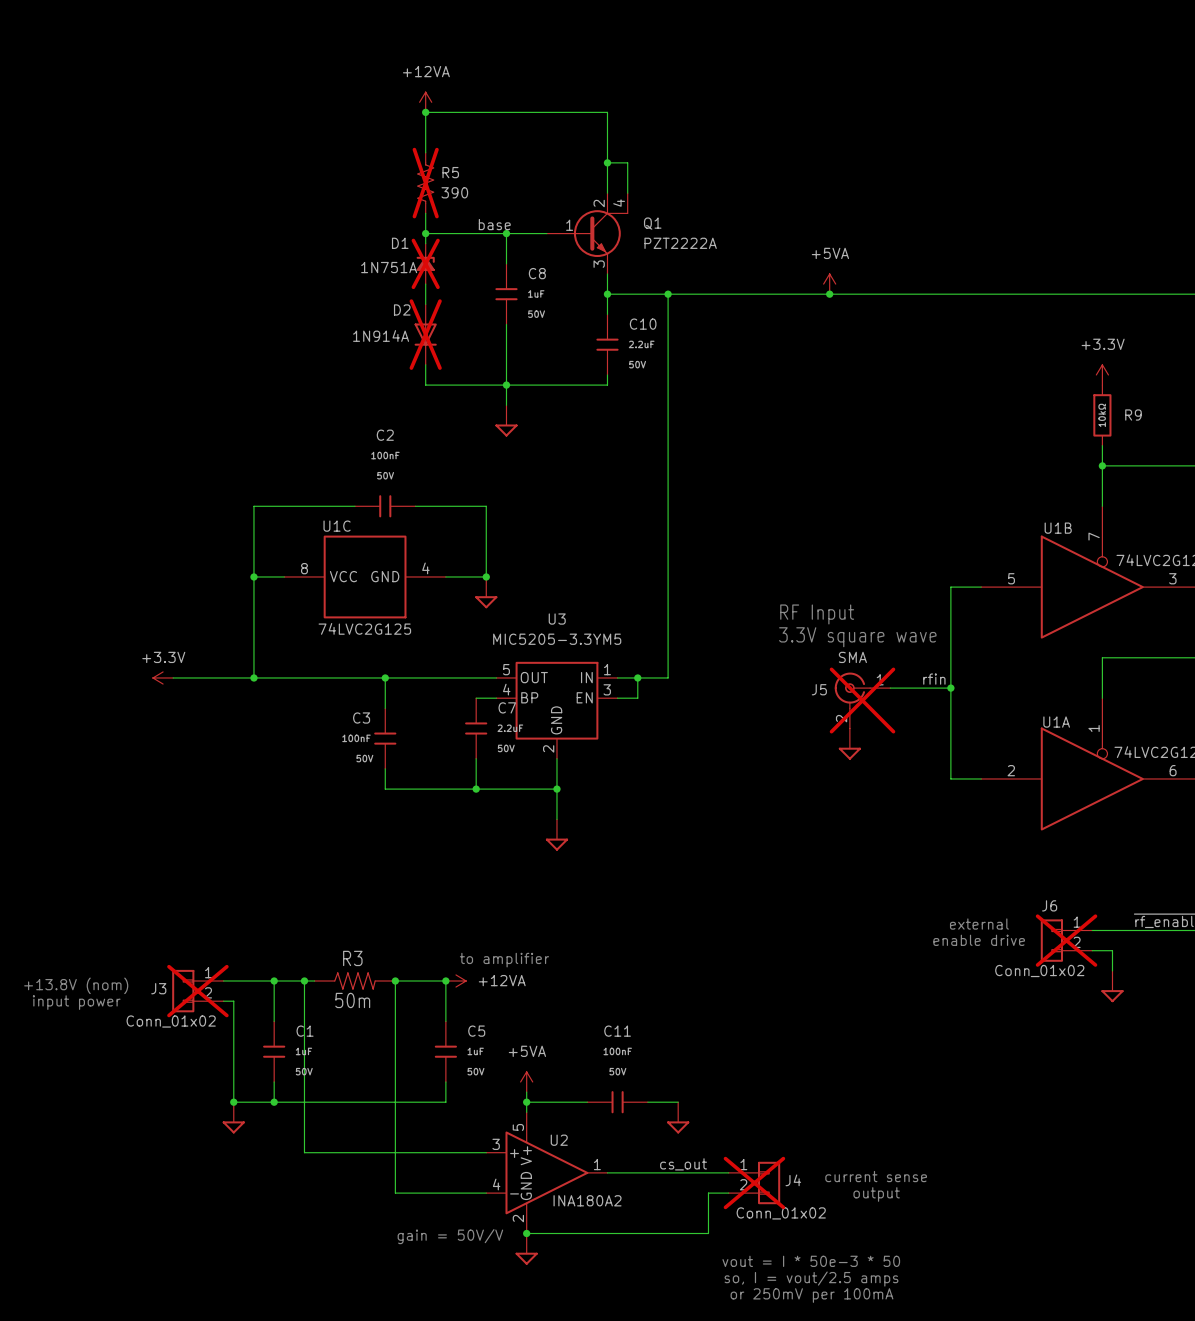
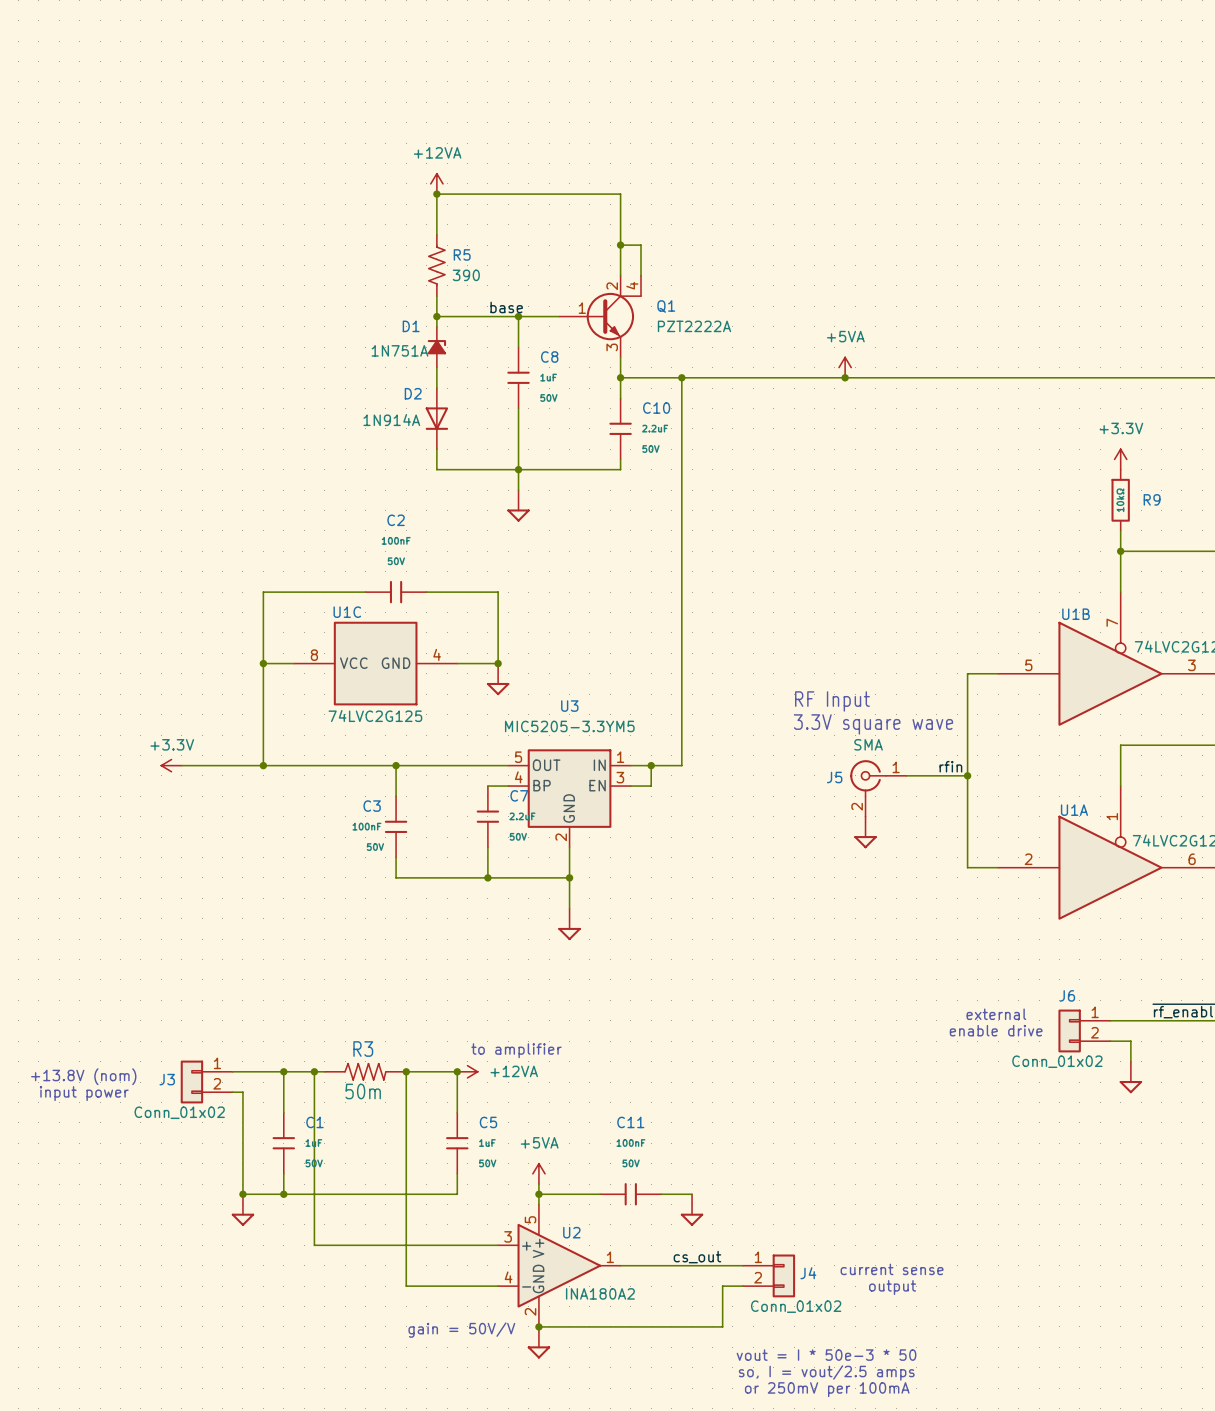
R5 do-not-place cross: (425, 183) -> none
D1 do-not-place cross: (425, 263) -> none
D2 do-not-place cross: (425, 334) -> none
J5 do-not-place cross: (862, 700) -> none
J6 do-not-place cross: (1066, 940) -> none
J3 do-not-place cross: (197, 991) -> none
J4 do-not-place cross: (754, 1183) -> none

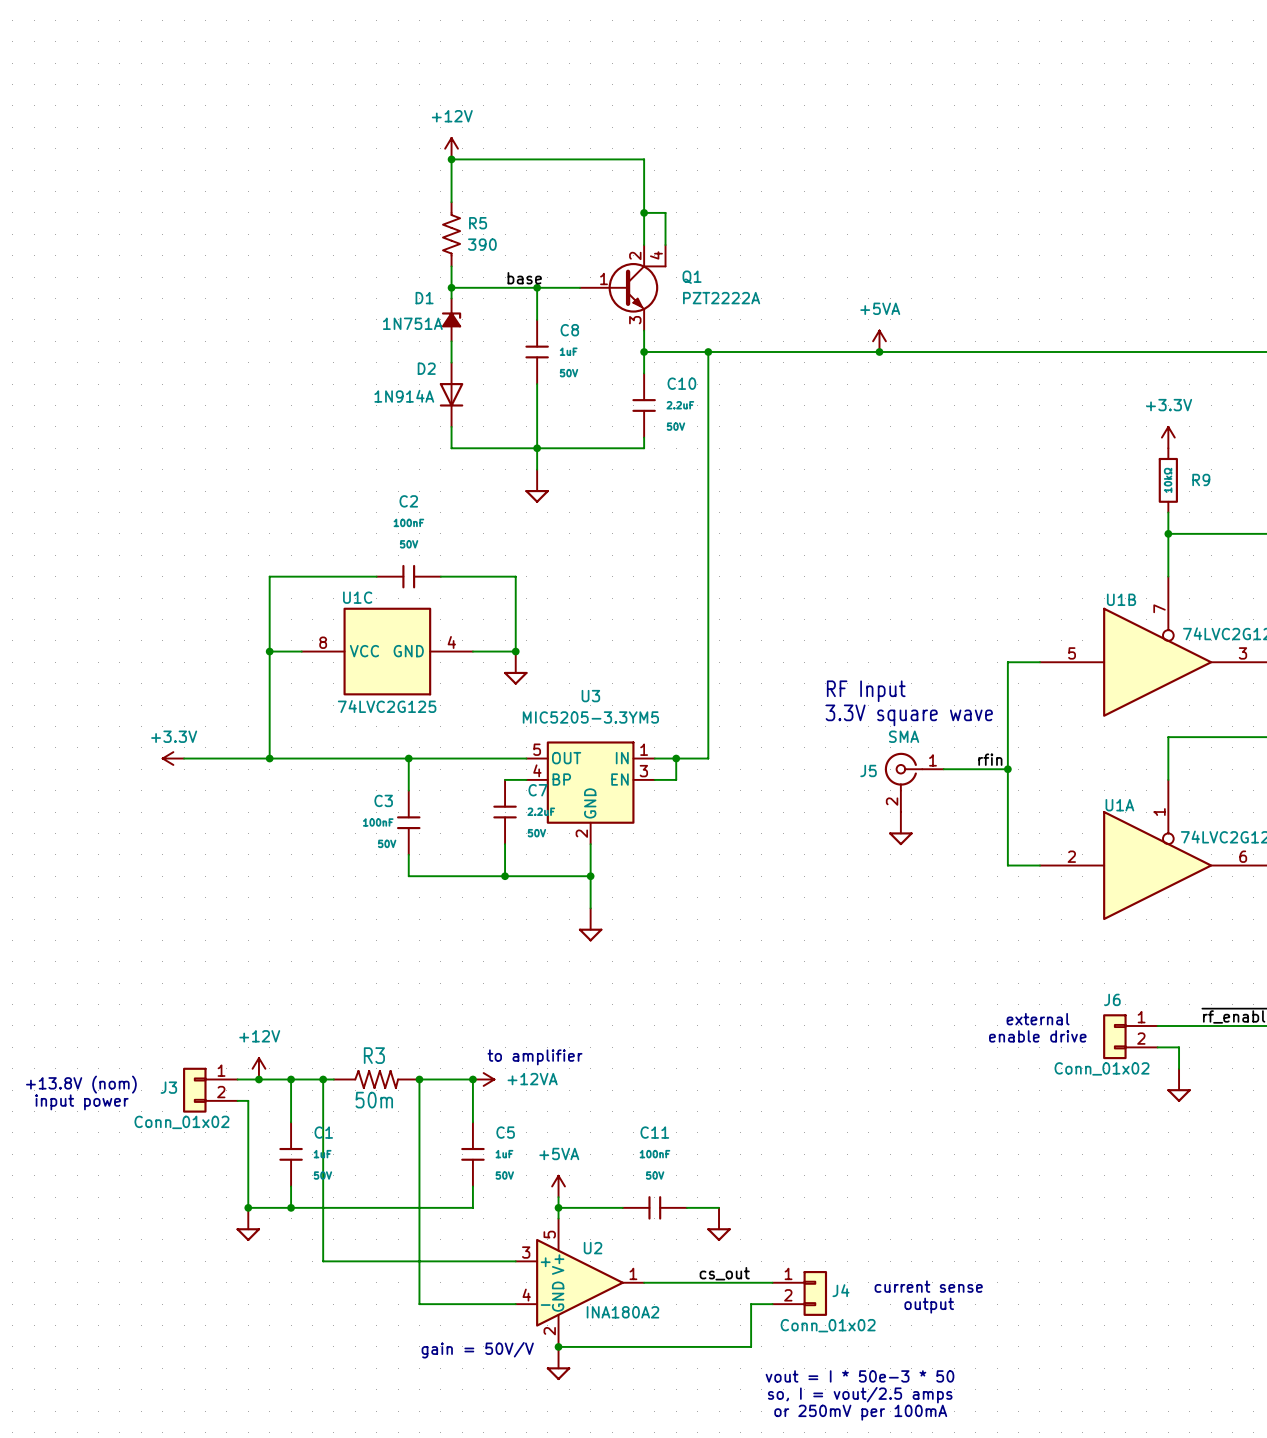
power symbol: +12VA (436, 183) -> +12V (451, 148)
power symbol: none -> +12V (258, 1068)
junction: none -> (258, 1079)

